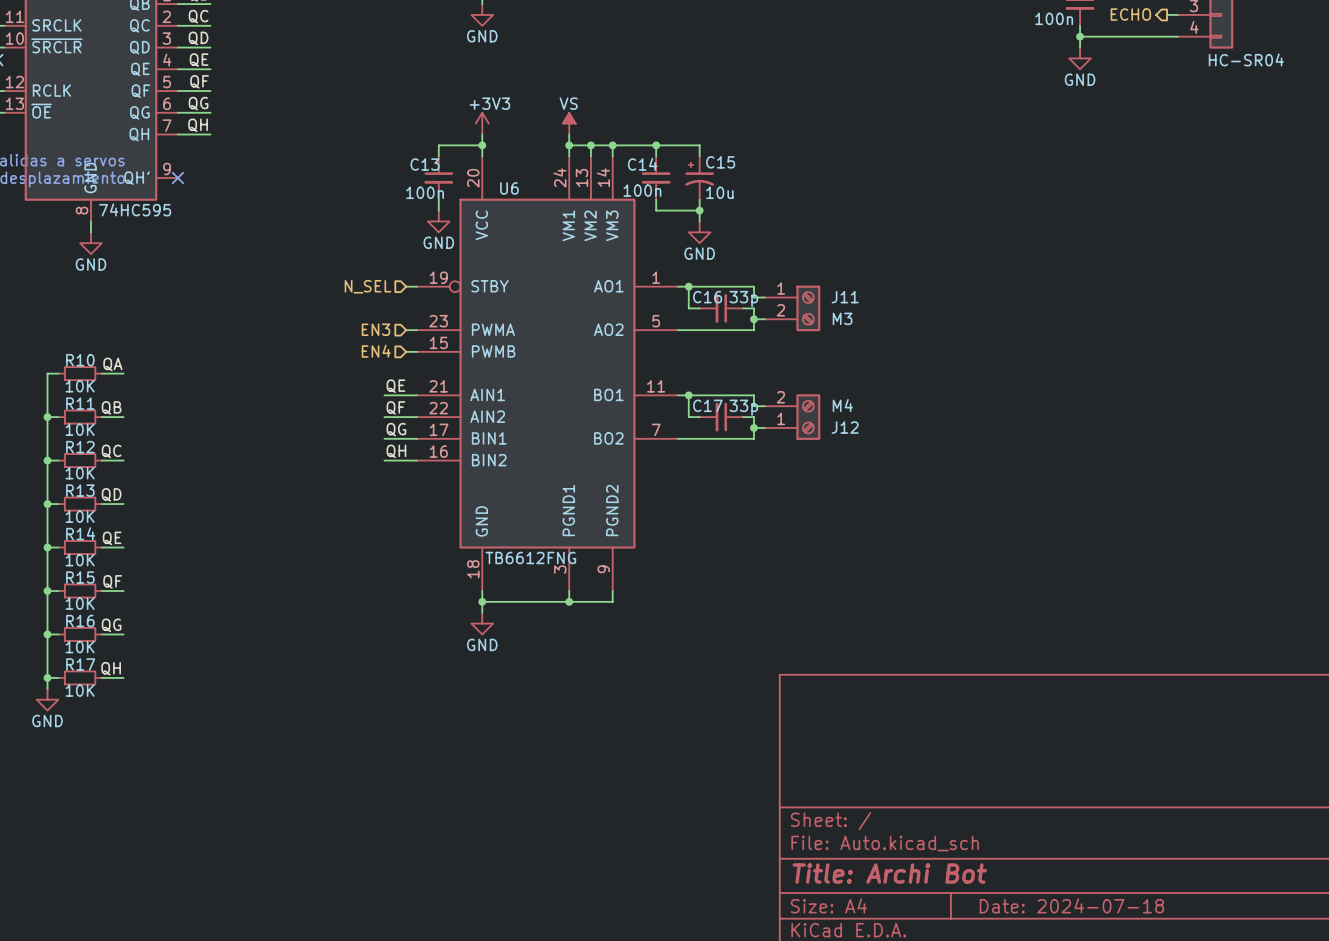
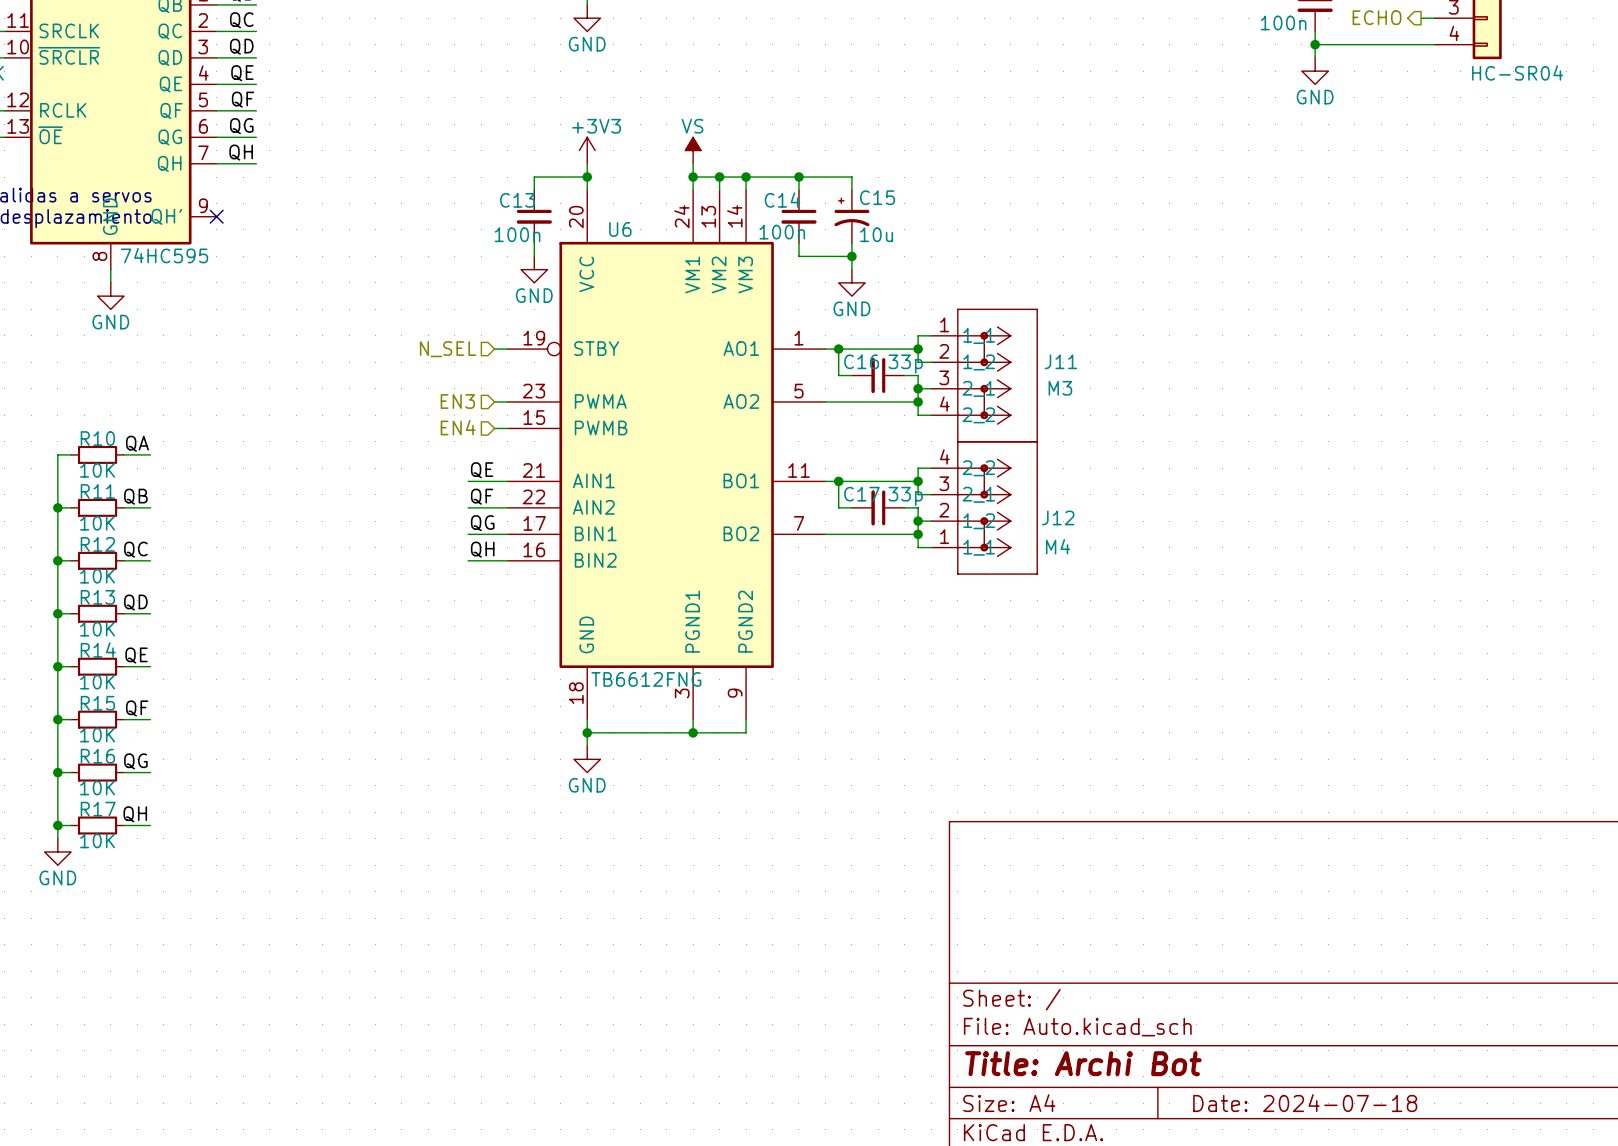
wire: none -> (931, 335) (918, 335) (918, 349)
J11 symbol: [764, 285, 821, 332] -> [931, 308, 1038, 443]
junction: none -> (918, 349)
wire: none -> (918, 402) (918, 415) (931, 415)
junction: none -> (918, 402)
wire: none -> (931, 468) (918, 468) (918, 481)
J12 symbol: [764, 394, 821, 440] -> [931, 441, 1038, 575]
junction: none -> (918, 481)
J12 value position: M4 (842, 405) -> M4 (1058, 546)
wire: none -> (918, 534) (918, 547) (931, 547)
junction: none -> (918, 534)

